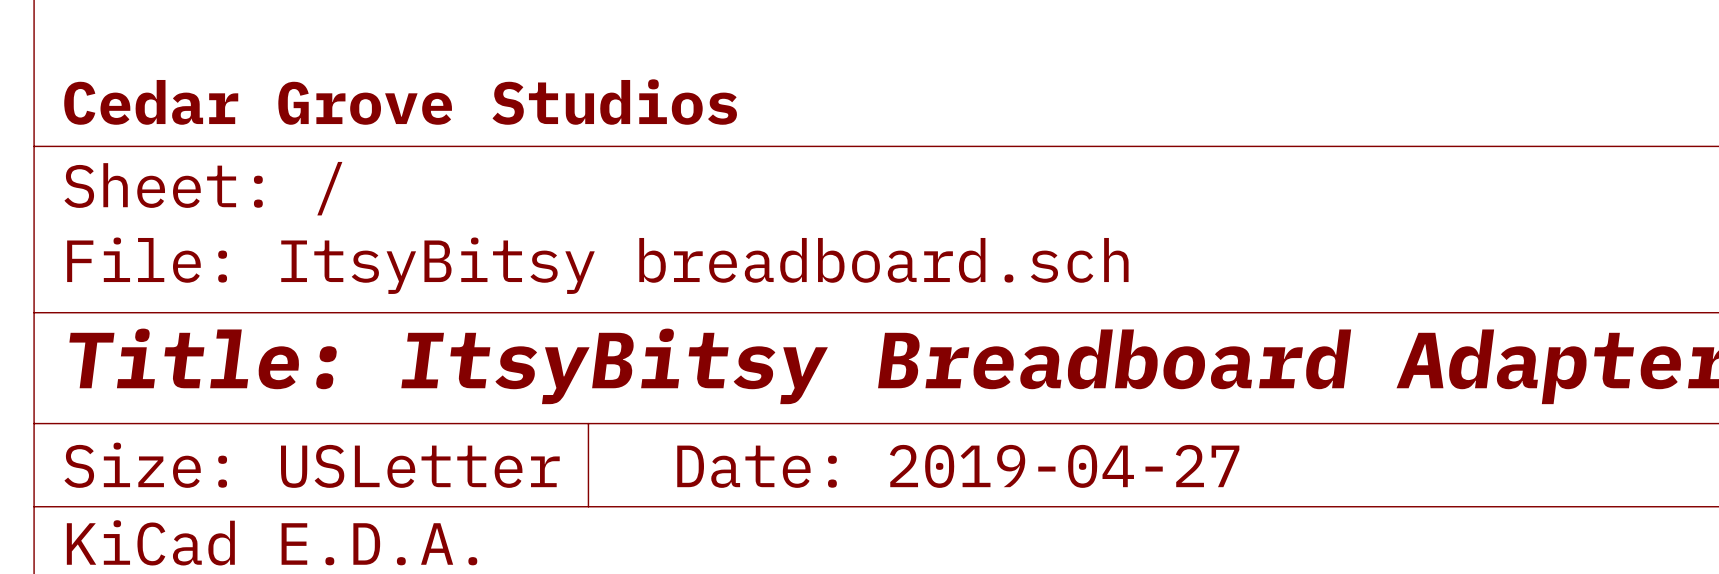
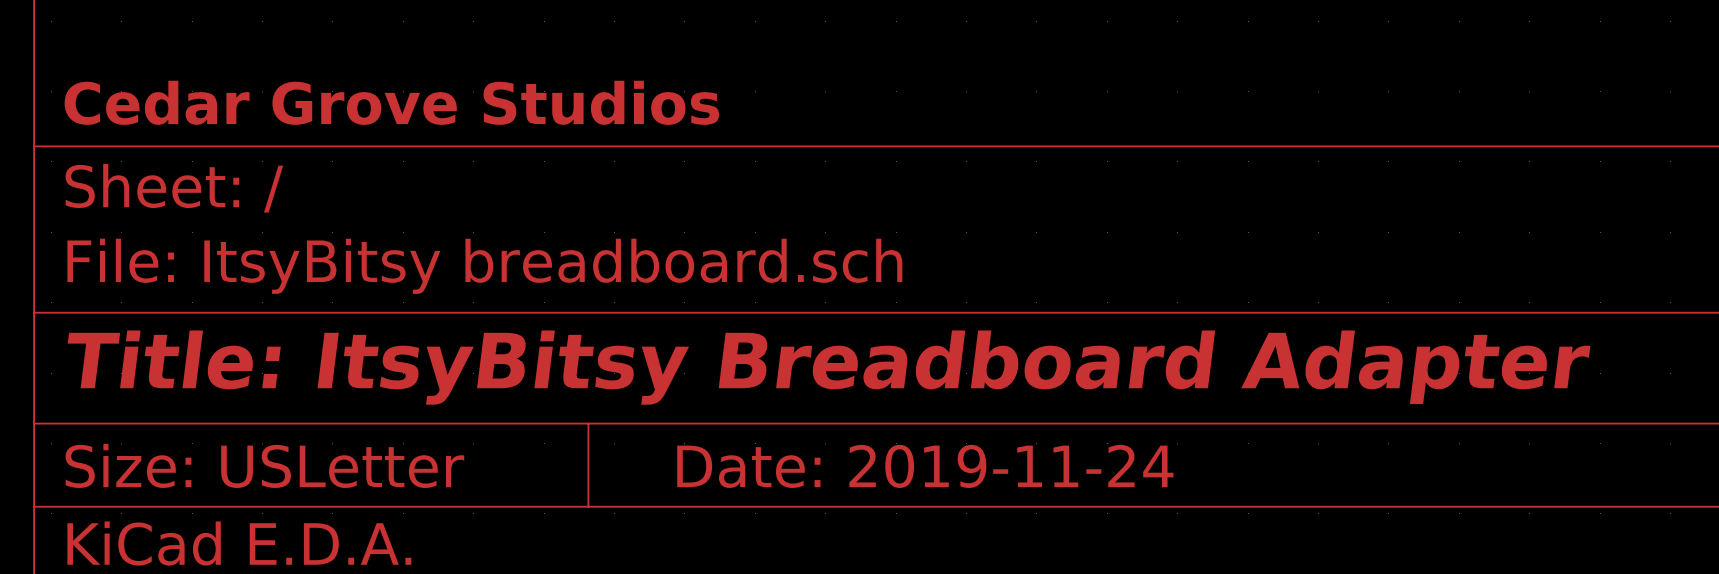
title block: Date: 2019-04-27 (958, 466) -> Date: 2019-11-24 (925, 466)

